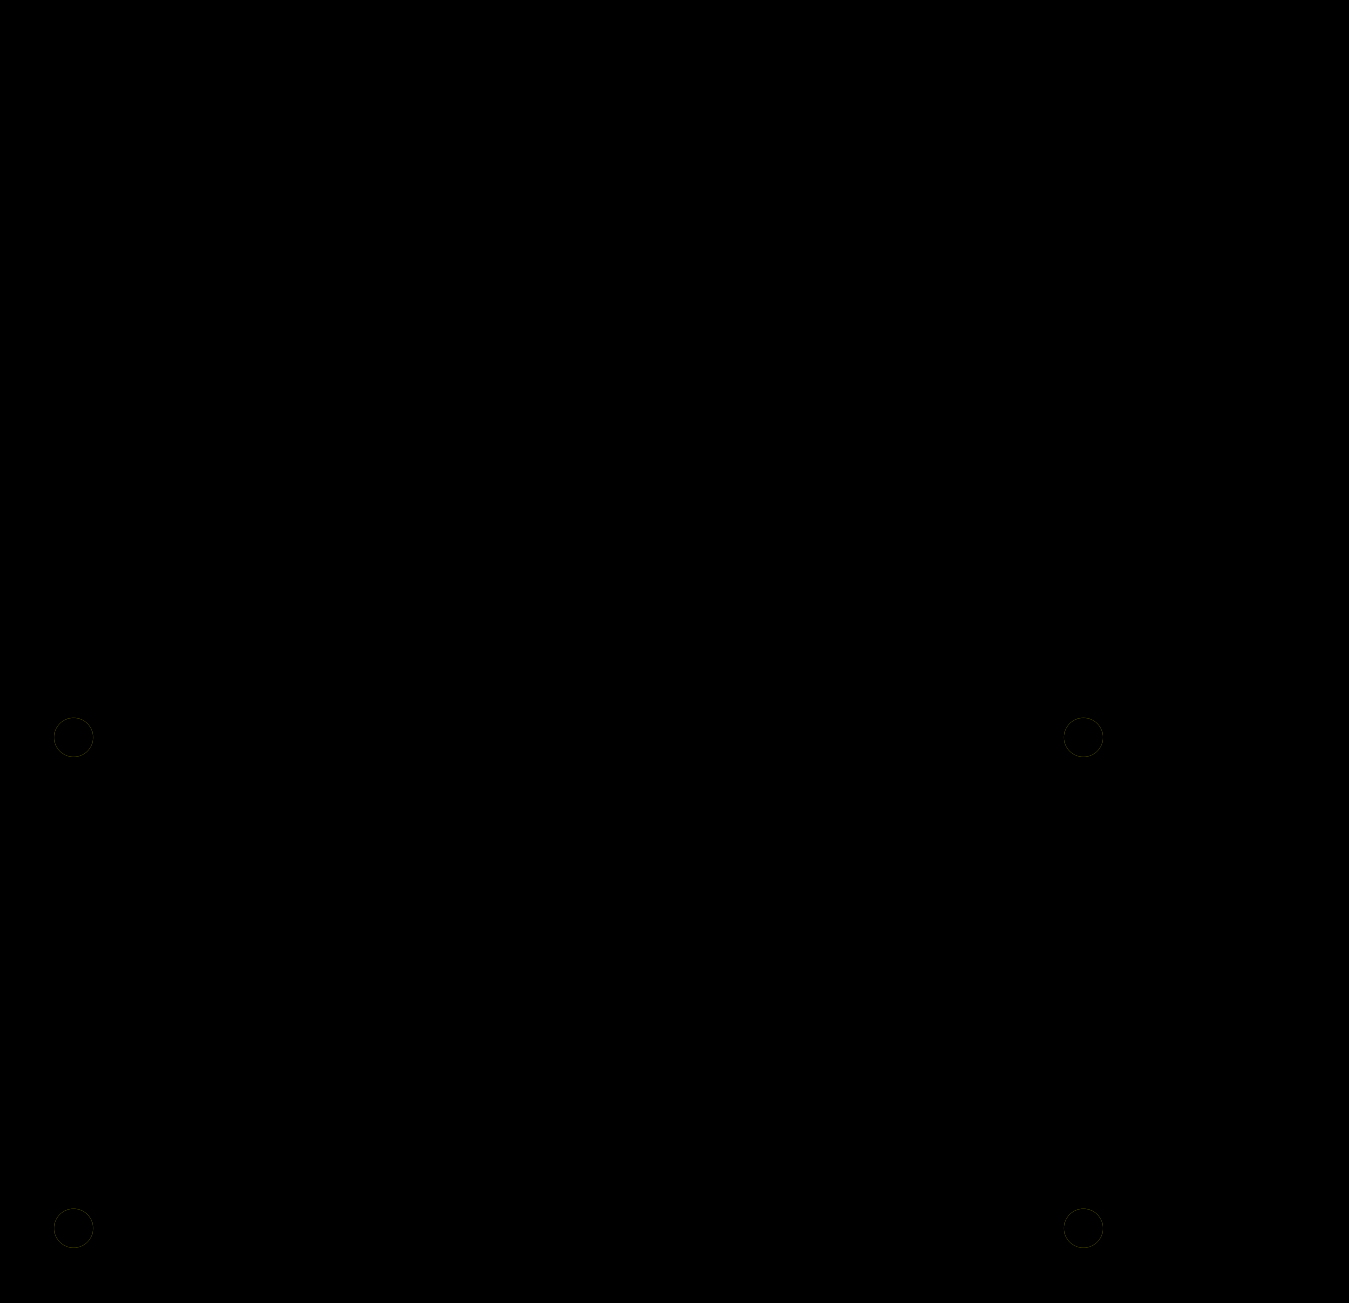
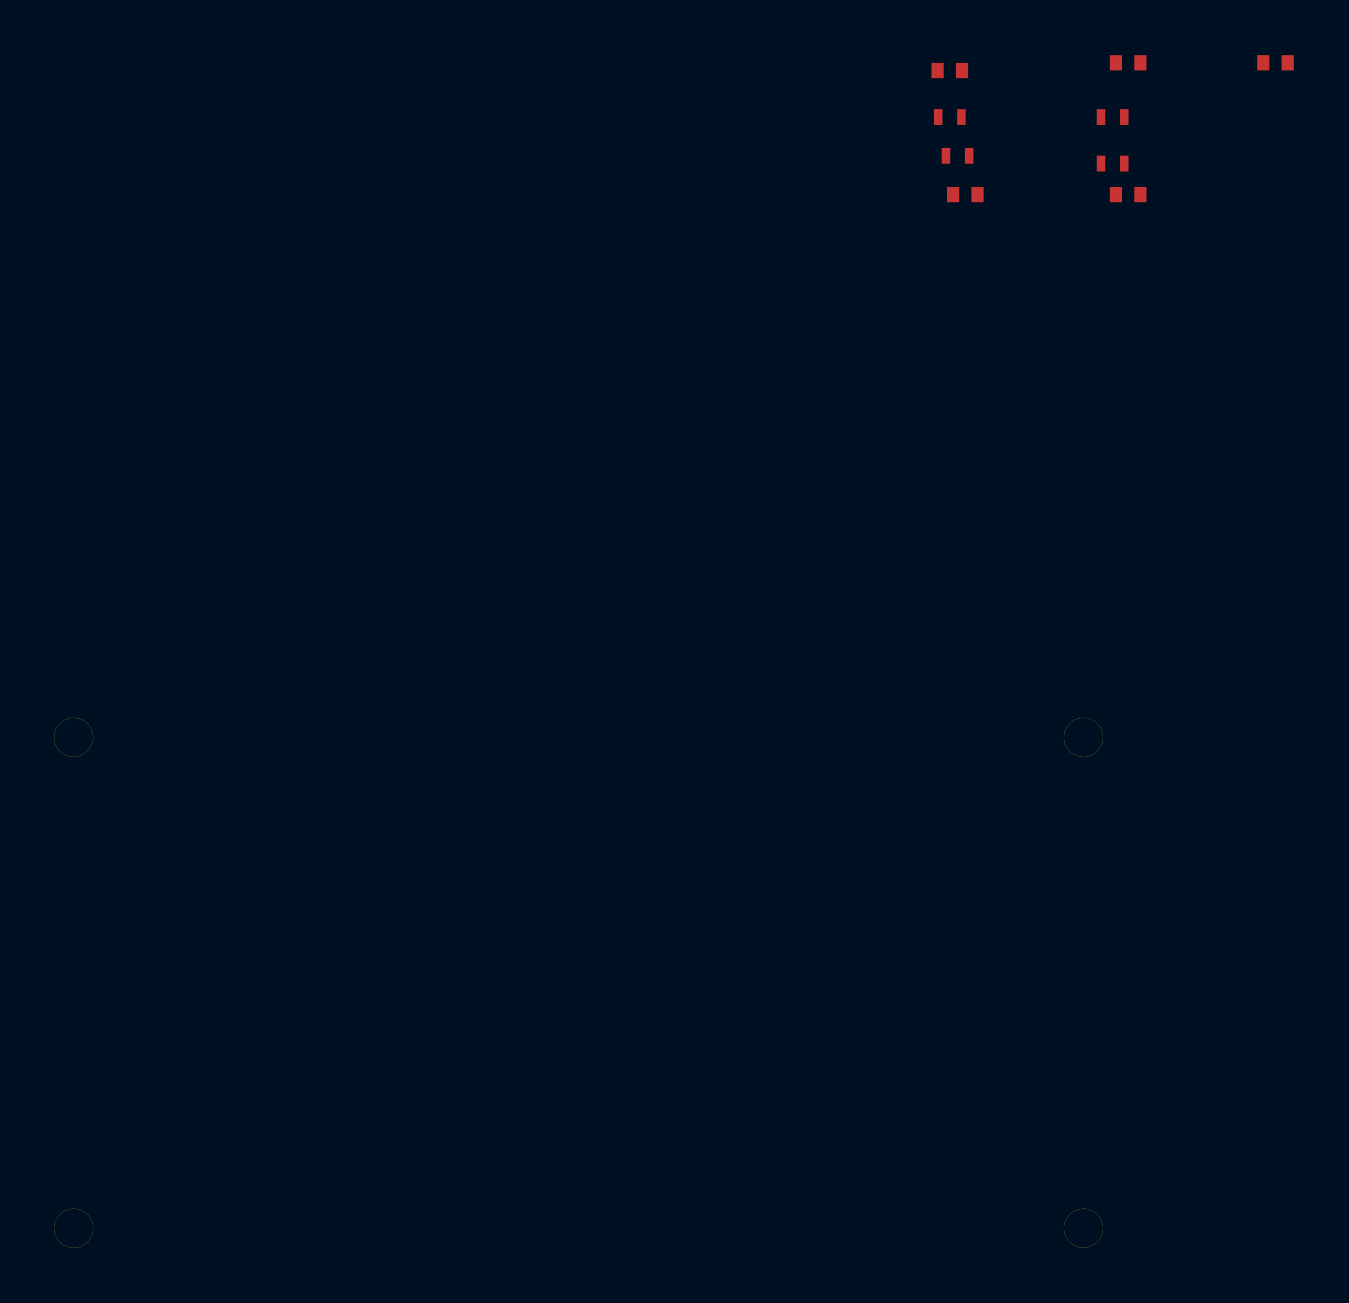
part: none -> (1128, 62)
part: none -> (1275, 62)
part: none -> (949, 70)
part: none -> (949, 117)
part: none -> (1112, 117)
part: none -> (957, 155)
part: none -> (1112, 163)
part: none -> (965, 194)
part: none -> (1128, 194)

